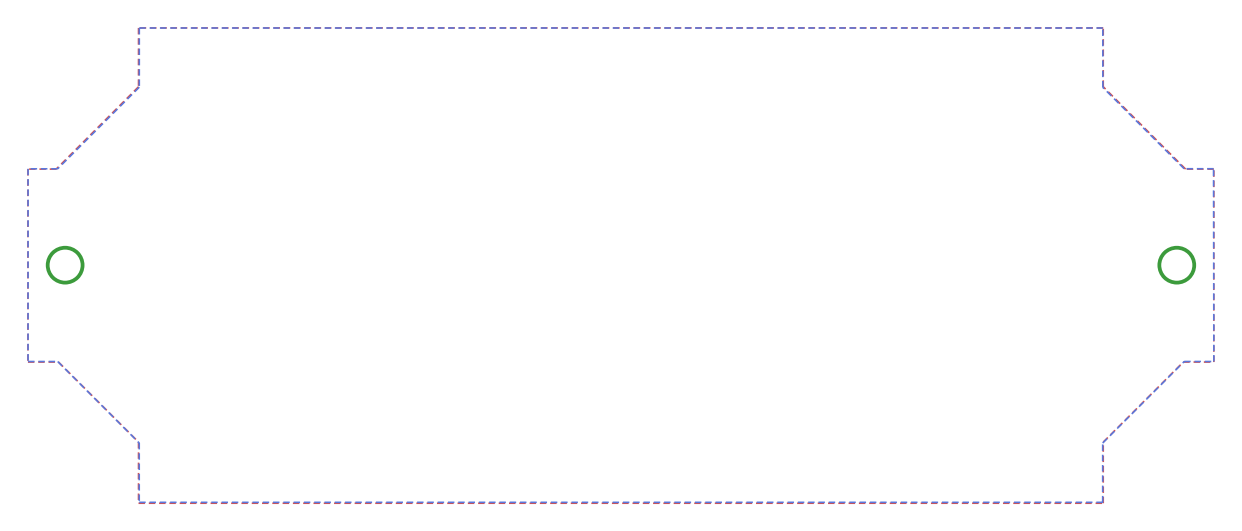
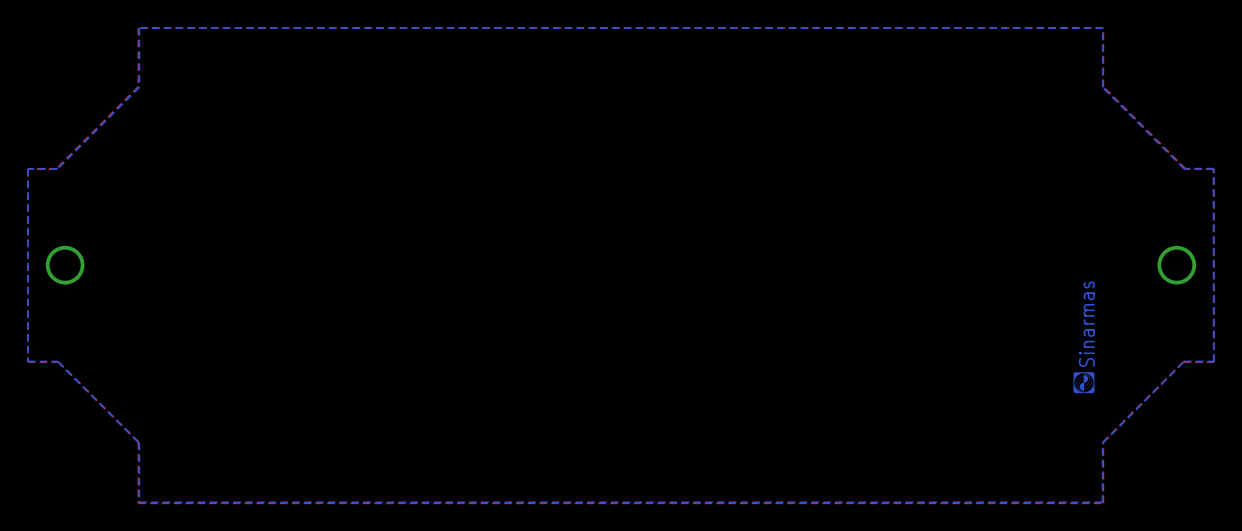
text: none -> Sinarmas (1086, 324)
drawing: none -> [1073, 372, 1095, 394]

